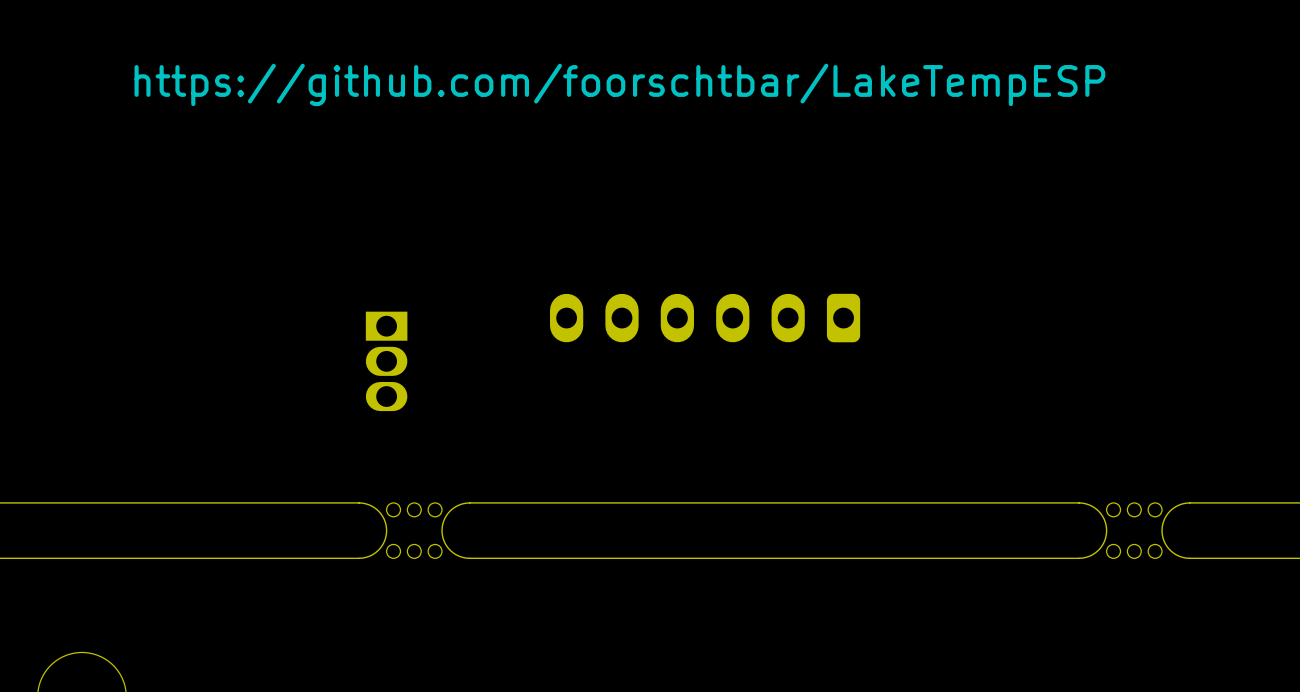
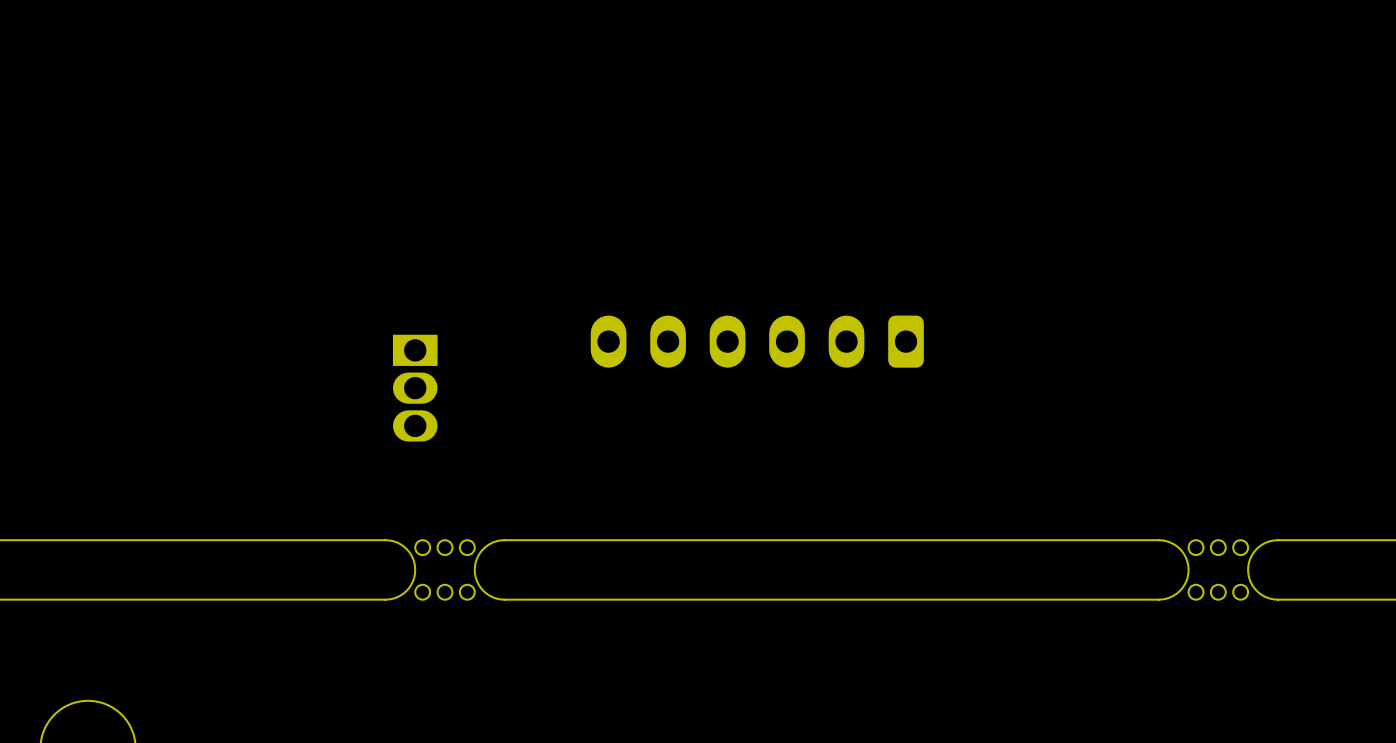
text: https://github.com/foorschtbar/LakeTempESP (619, 84) -> none

